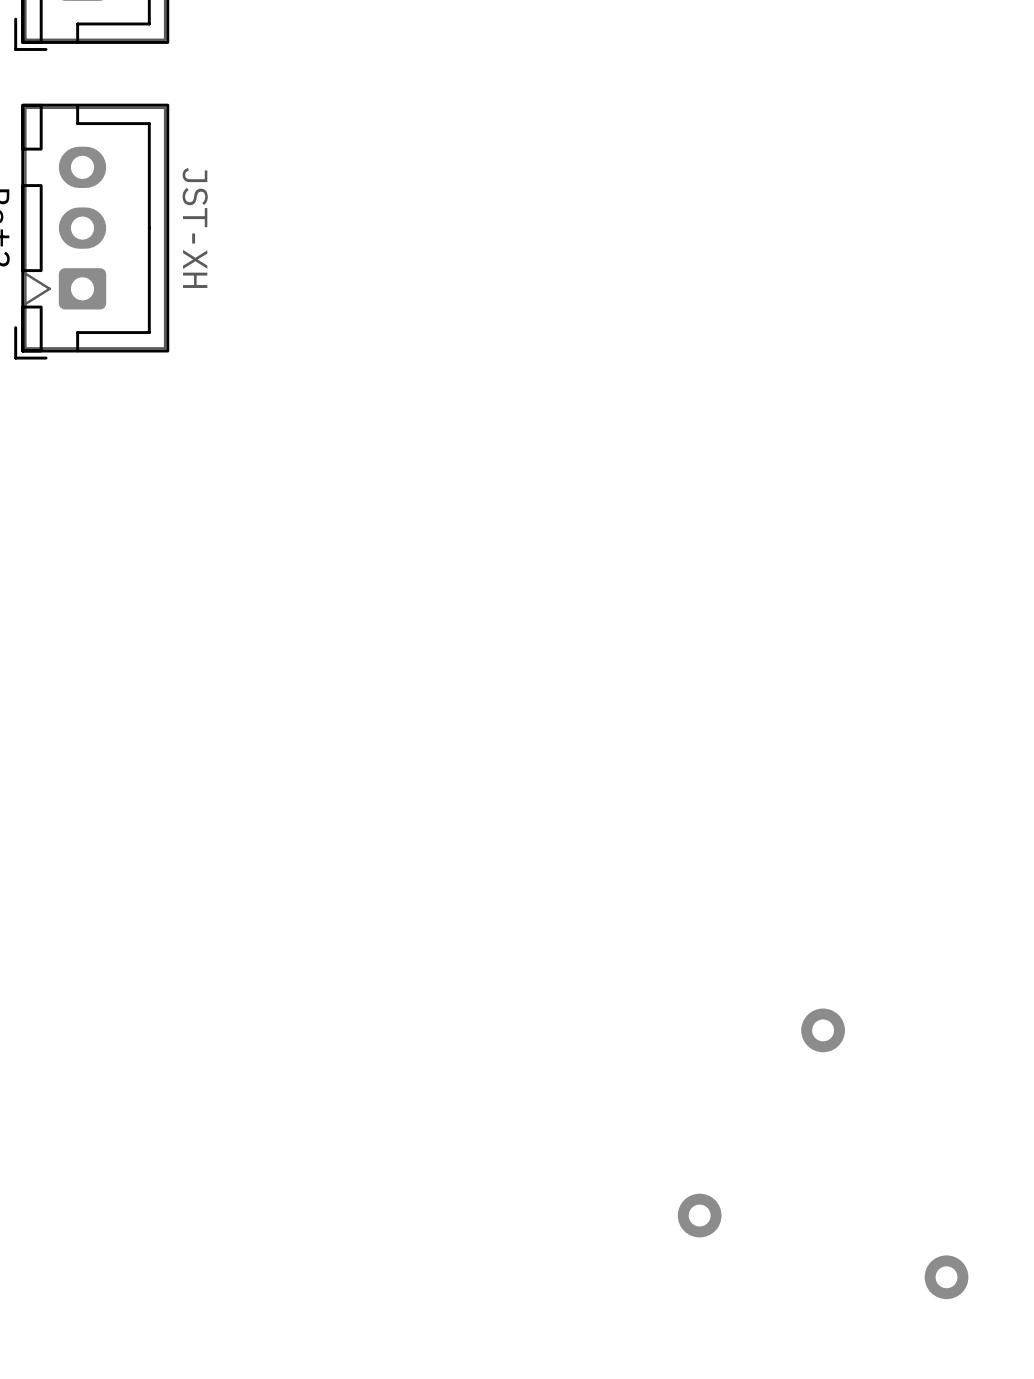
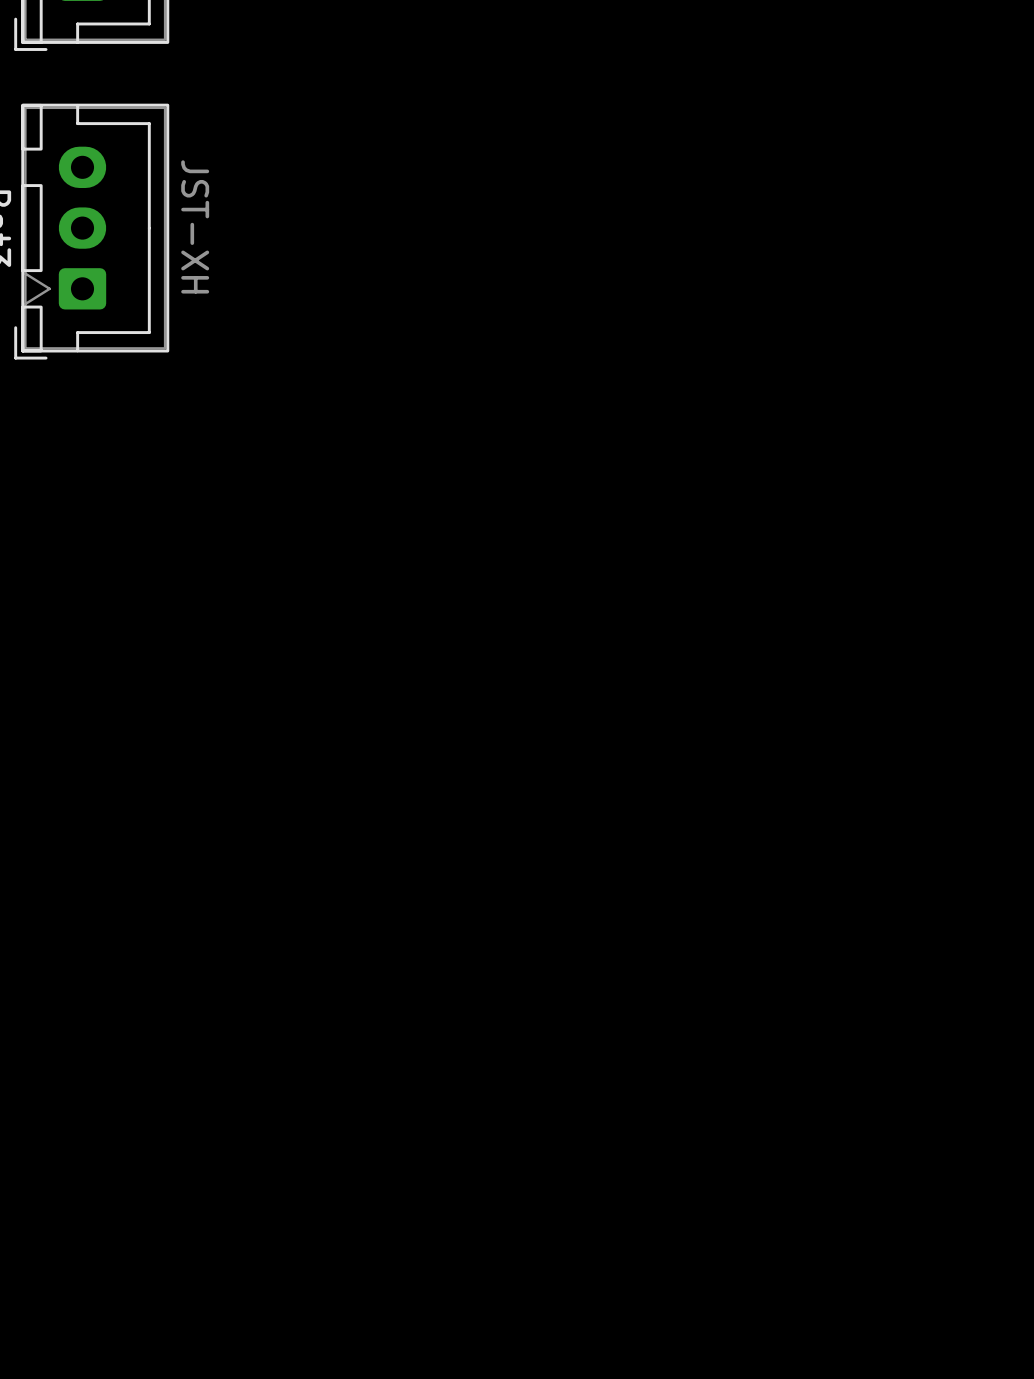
part: (823, 1030) -> none
part: (699, 1215) -> none
part: (946, 1277) -> none

